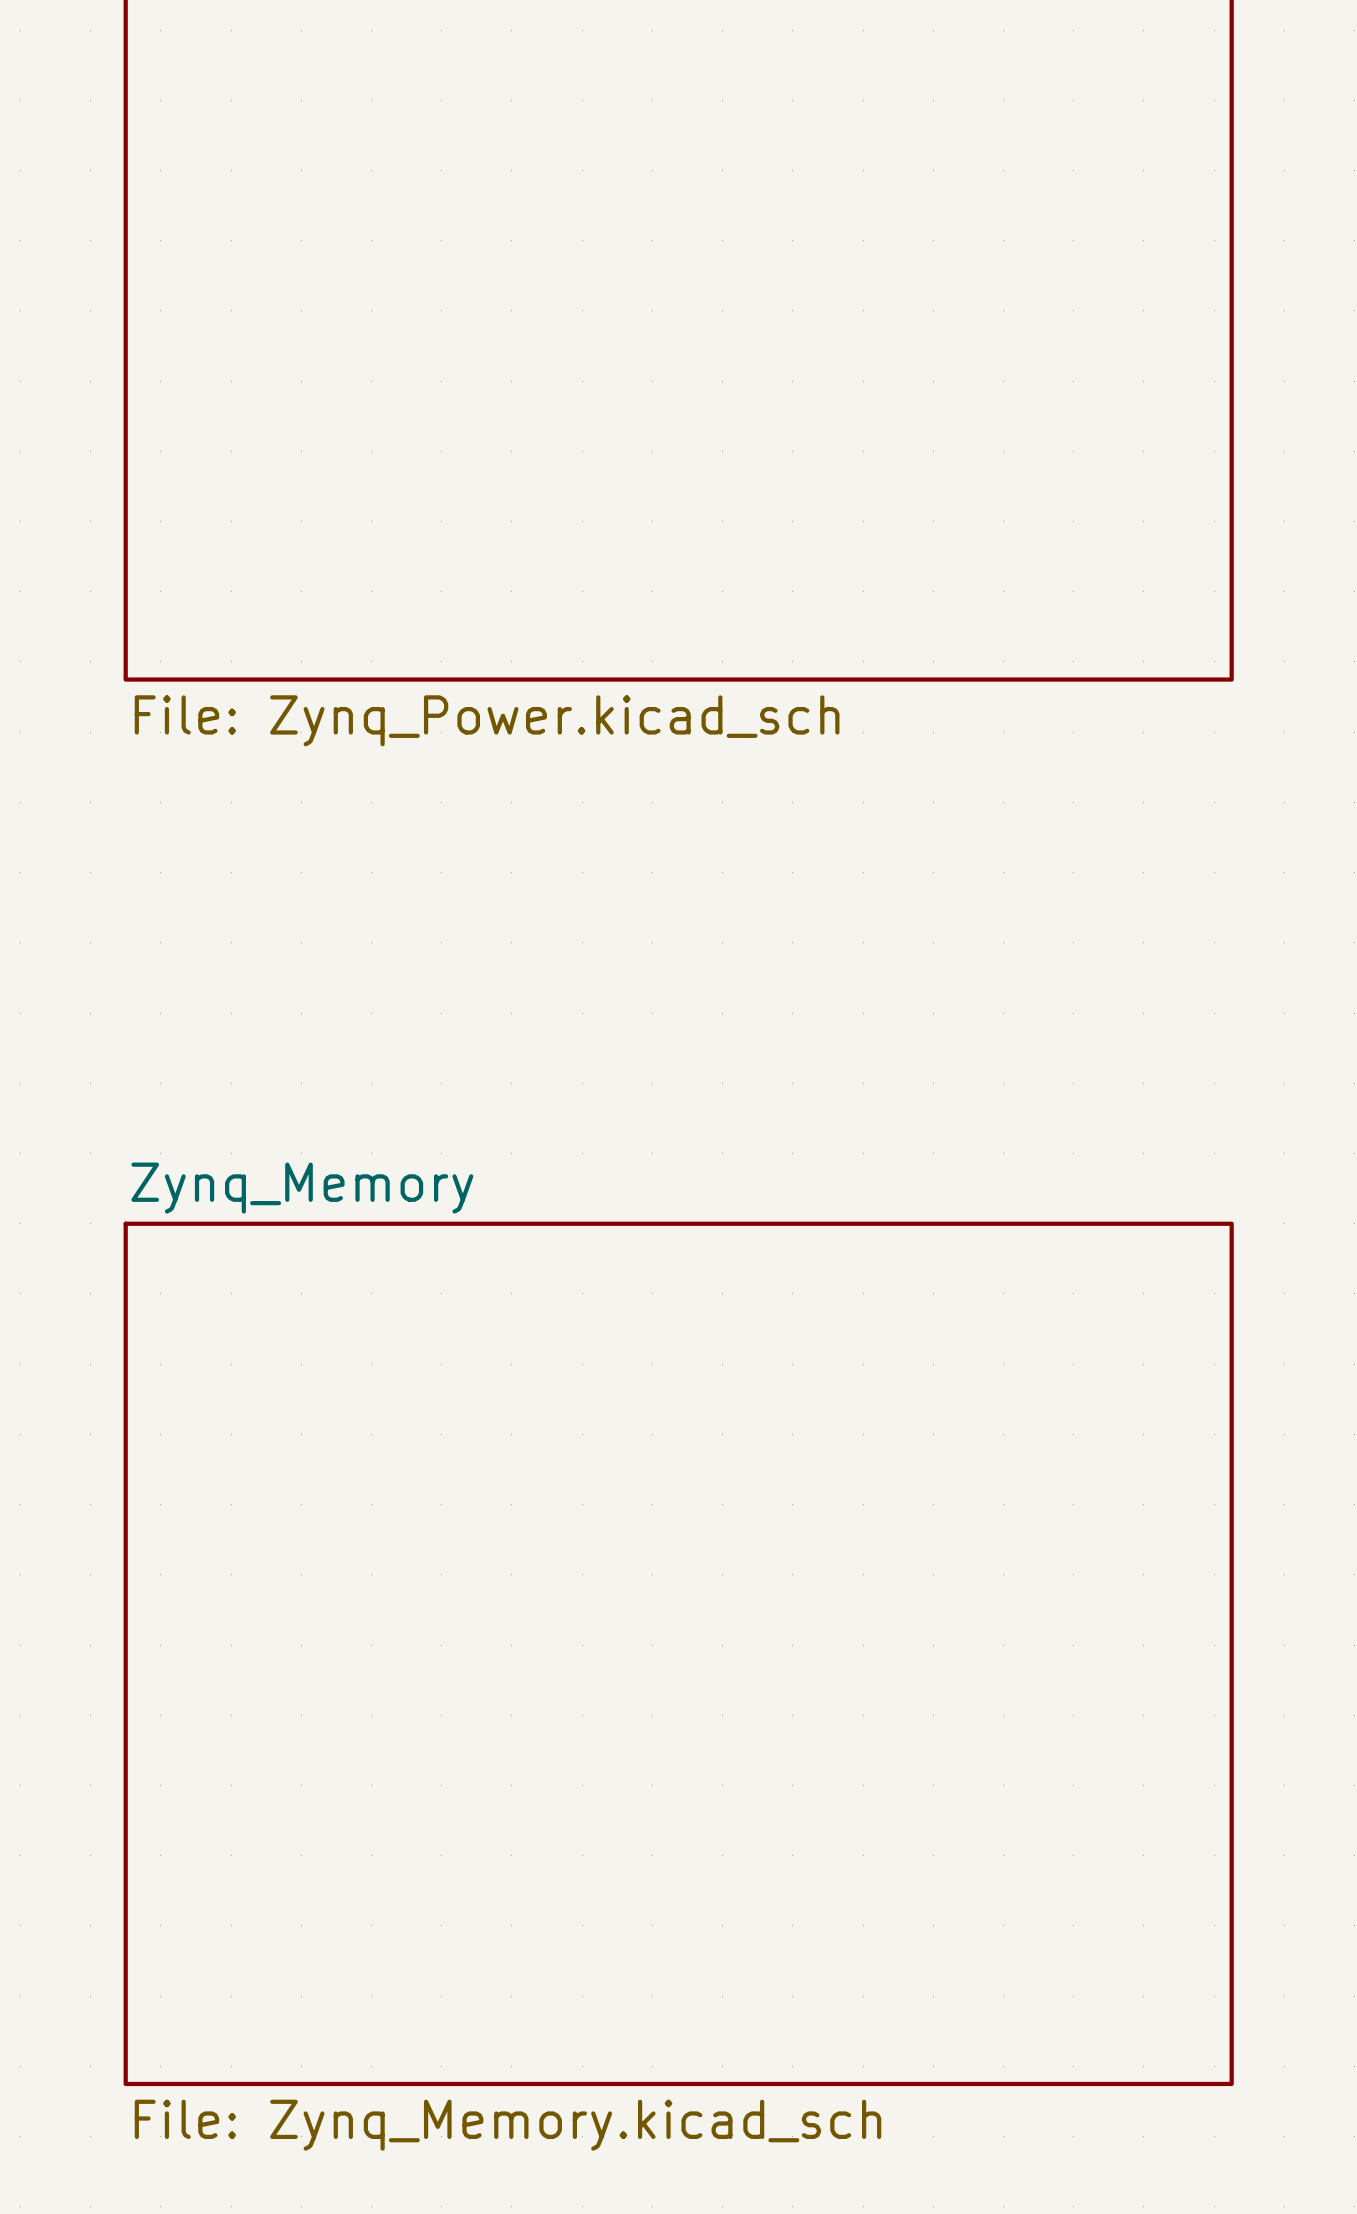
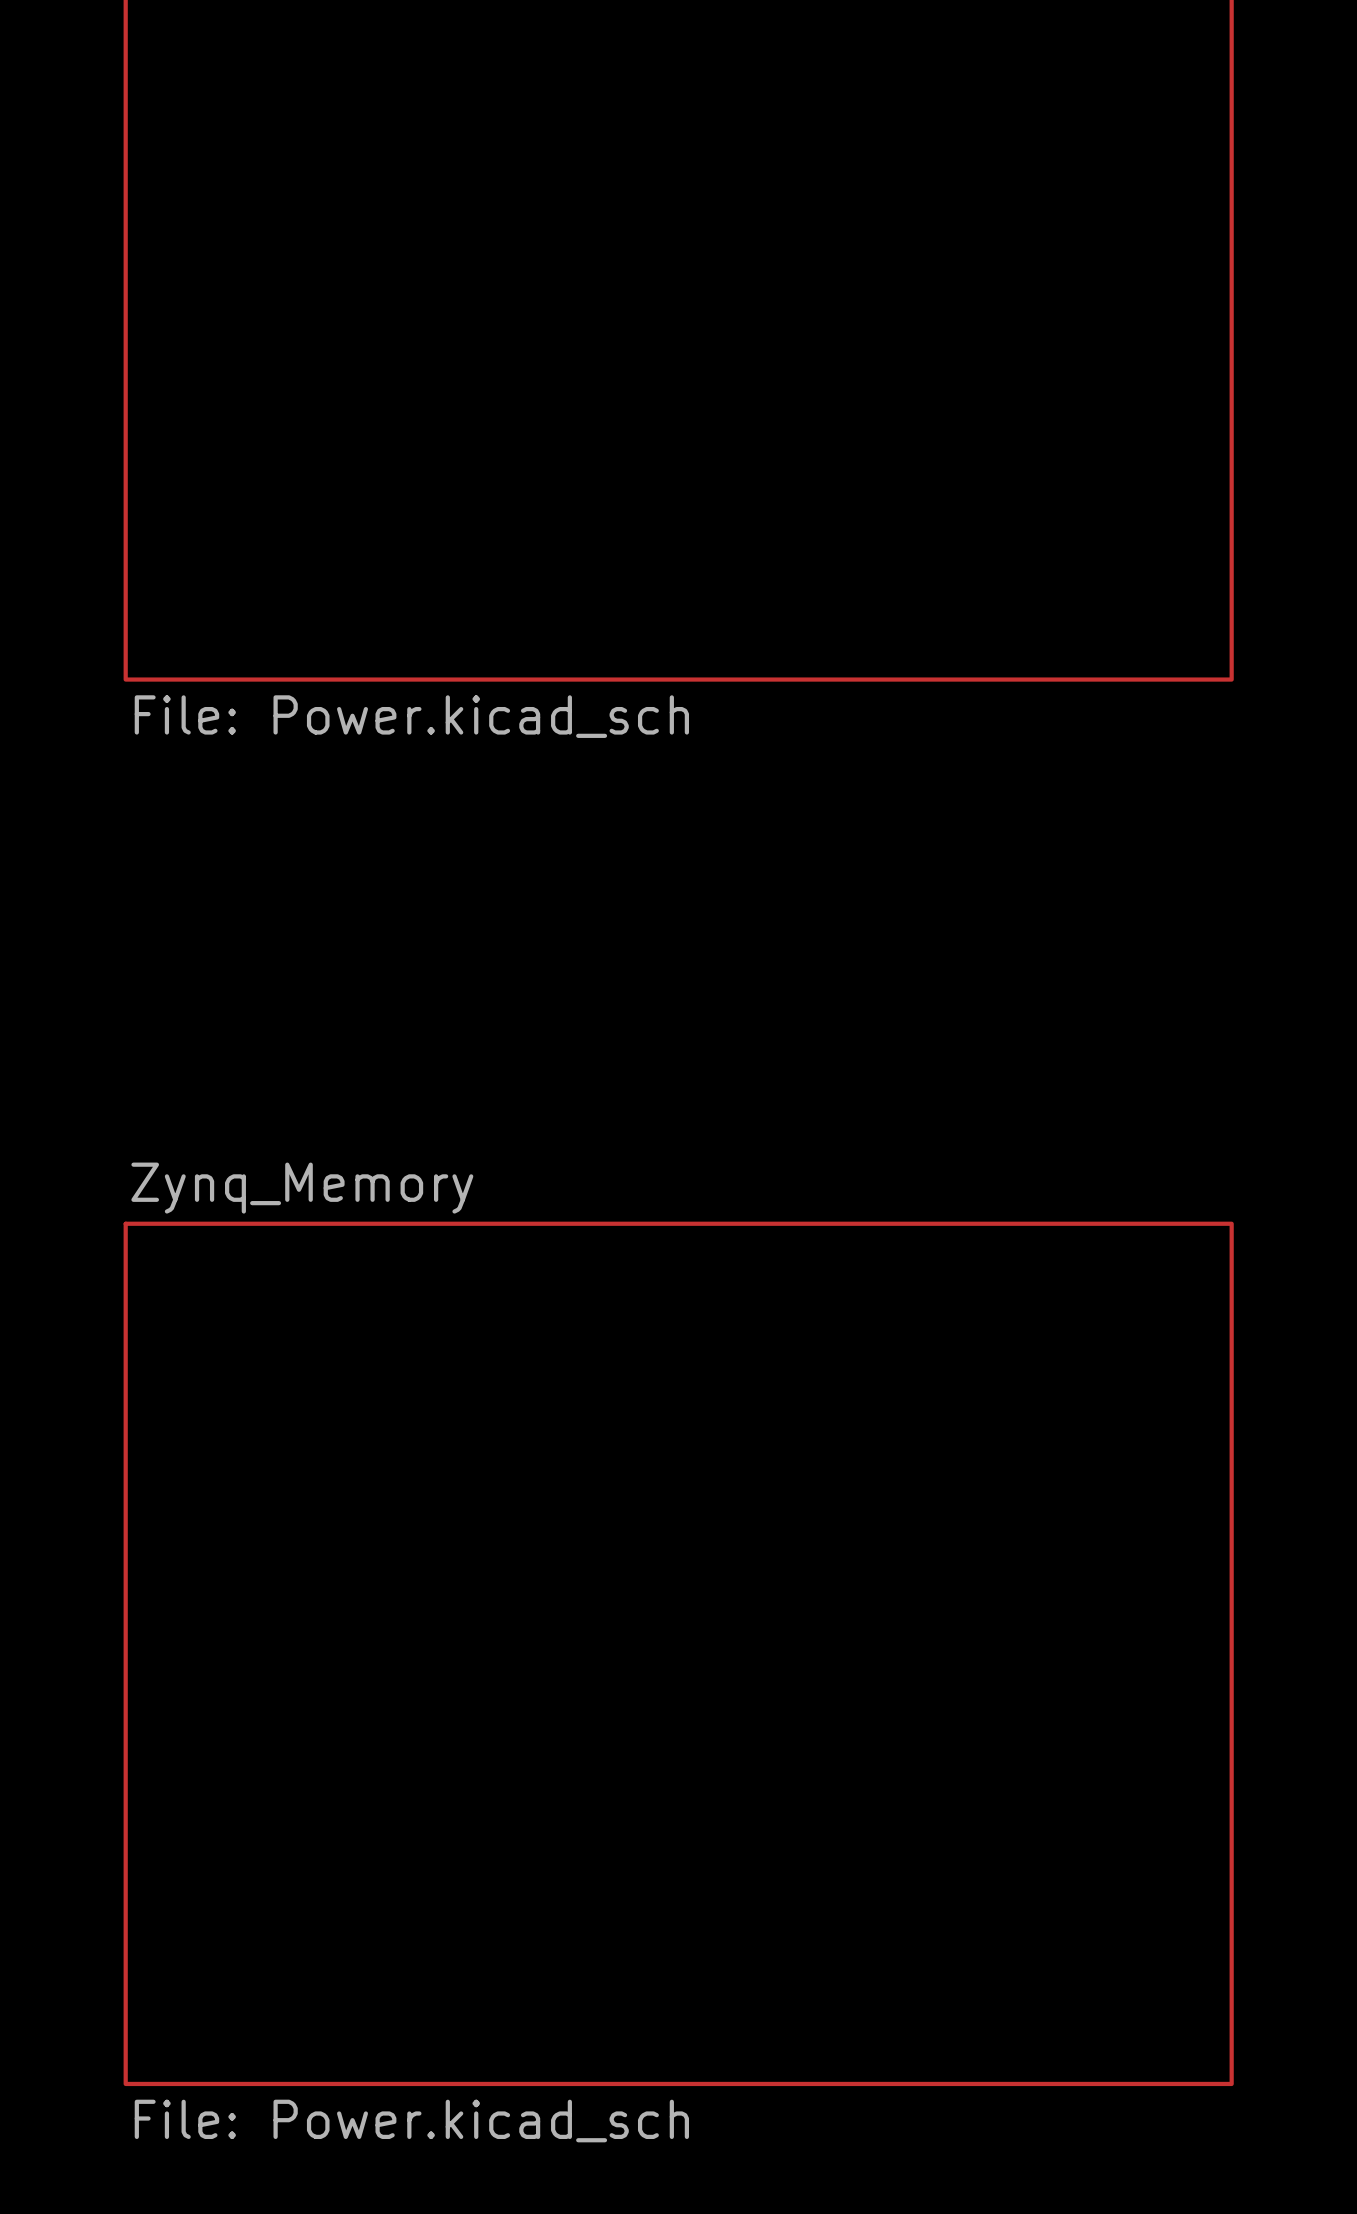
sheet value: File: Zynq_Power.kicad_sch (487, 720) -> File: Power.kicad_sch (411, 716)
sheet Zynq_Memory value: File: Zynq_Memory.kicad_sch (507, 2125) -> File: Power.kicad_sch (411, 2121)

